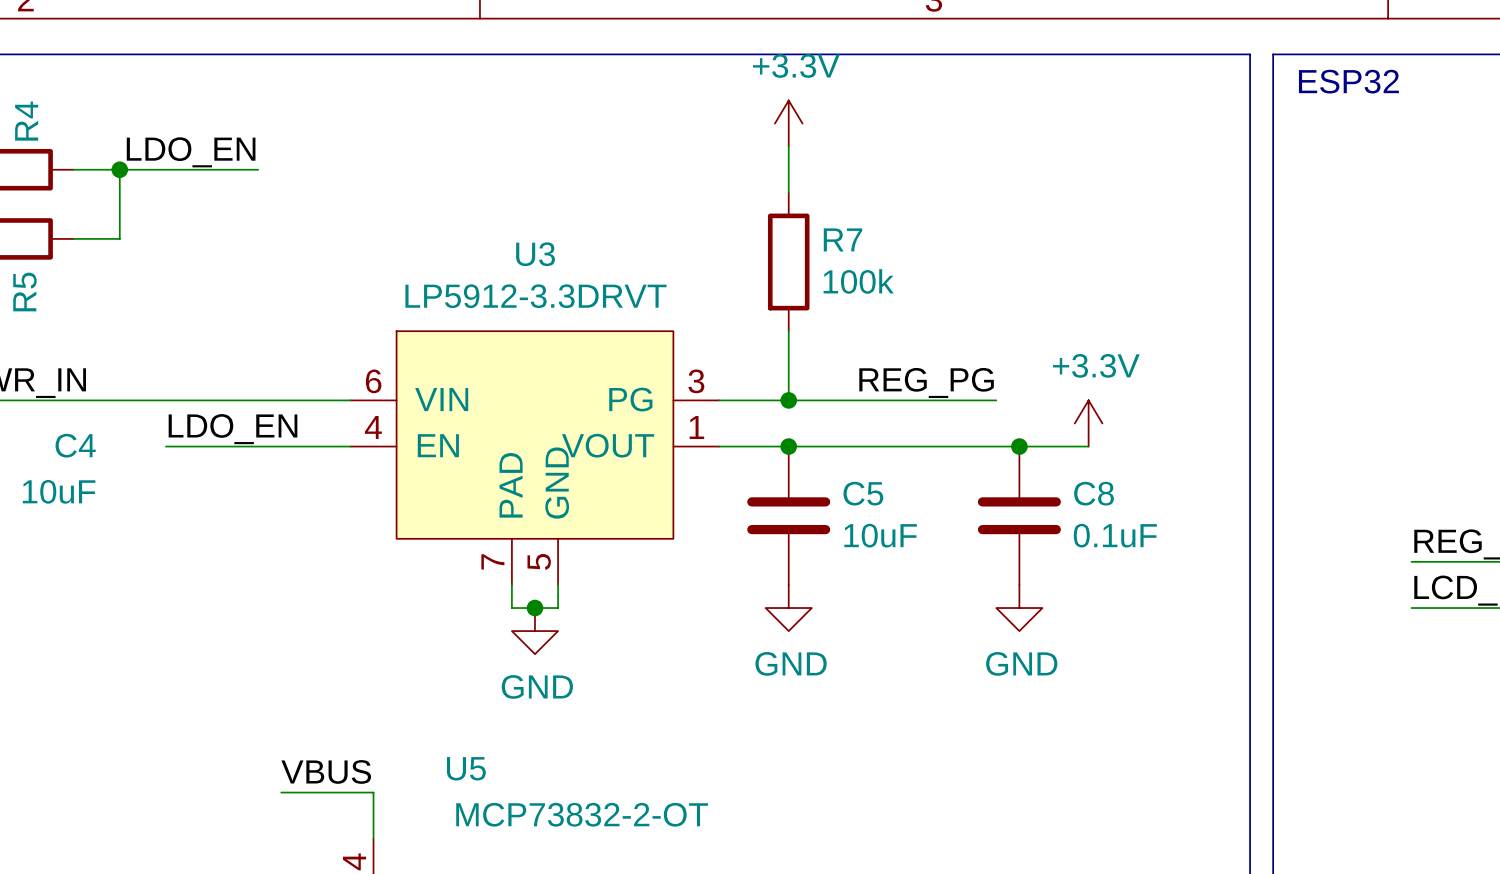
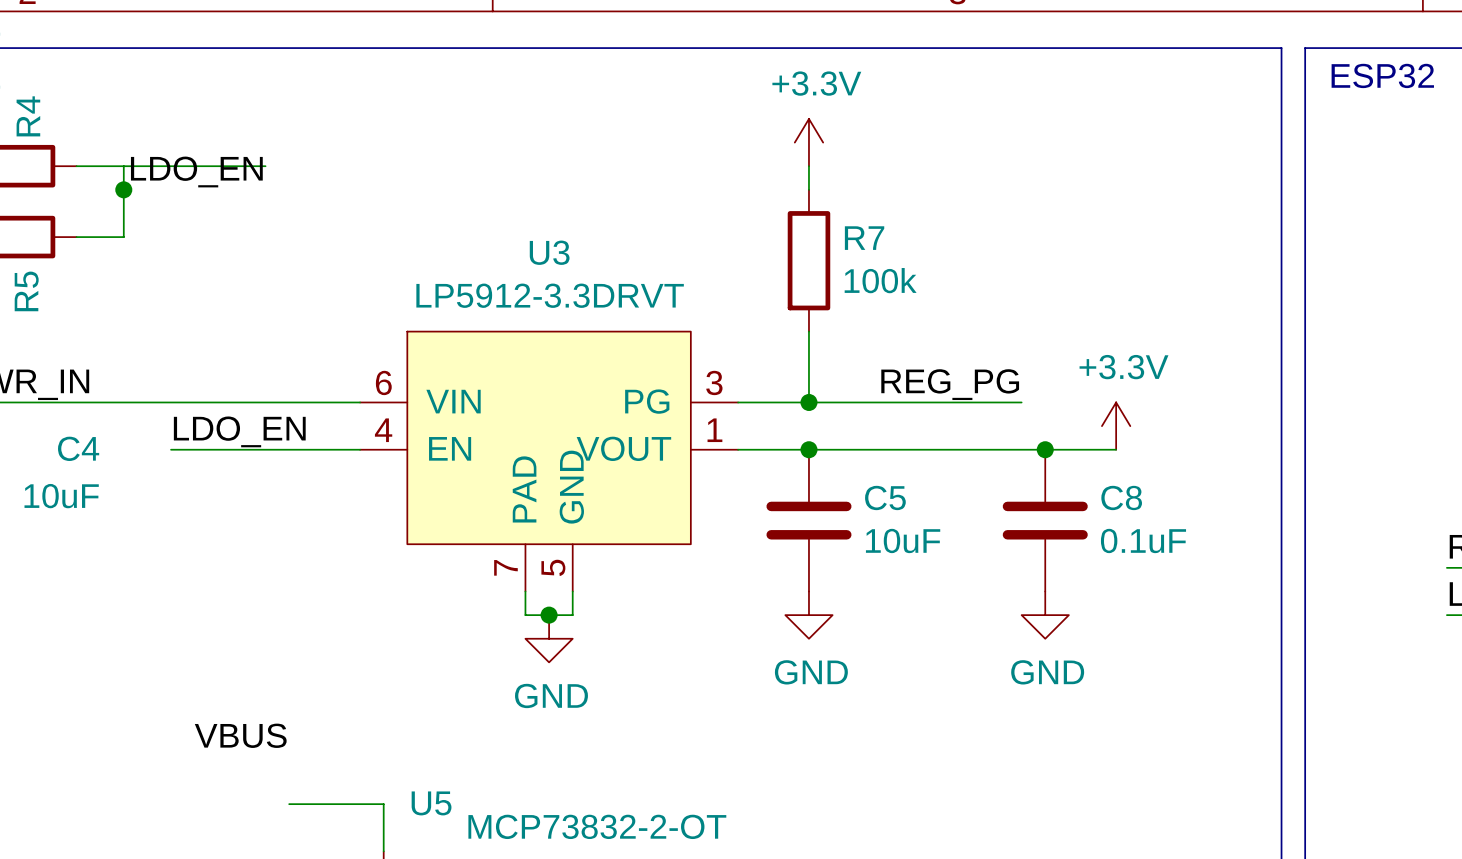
power symbol position: +3.3V (788, 123) -> +3.3V (808, 142)
label position: LDO_EN (191, 152) -> LDO_EN (196, 171)
junction position: (119, 169) -> (123, 189)
U5 name position: U5 (466, 768) -> U5 (431, 803)
label position: VBUS (326, 771) -> VBUS (240, 735)

